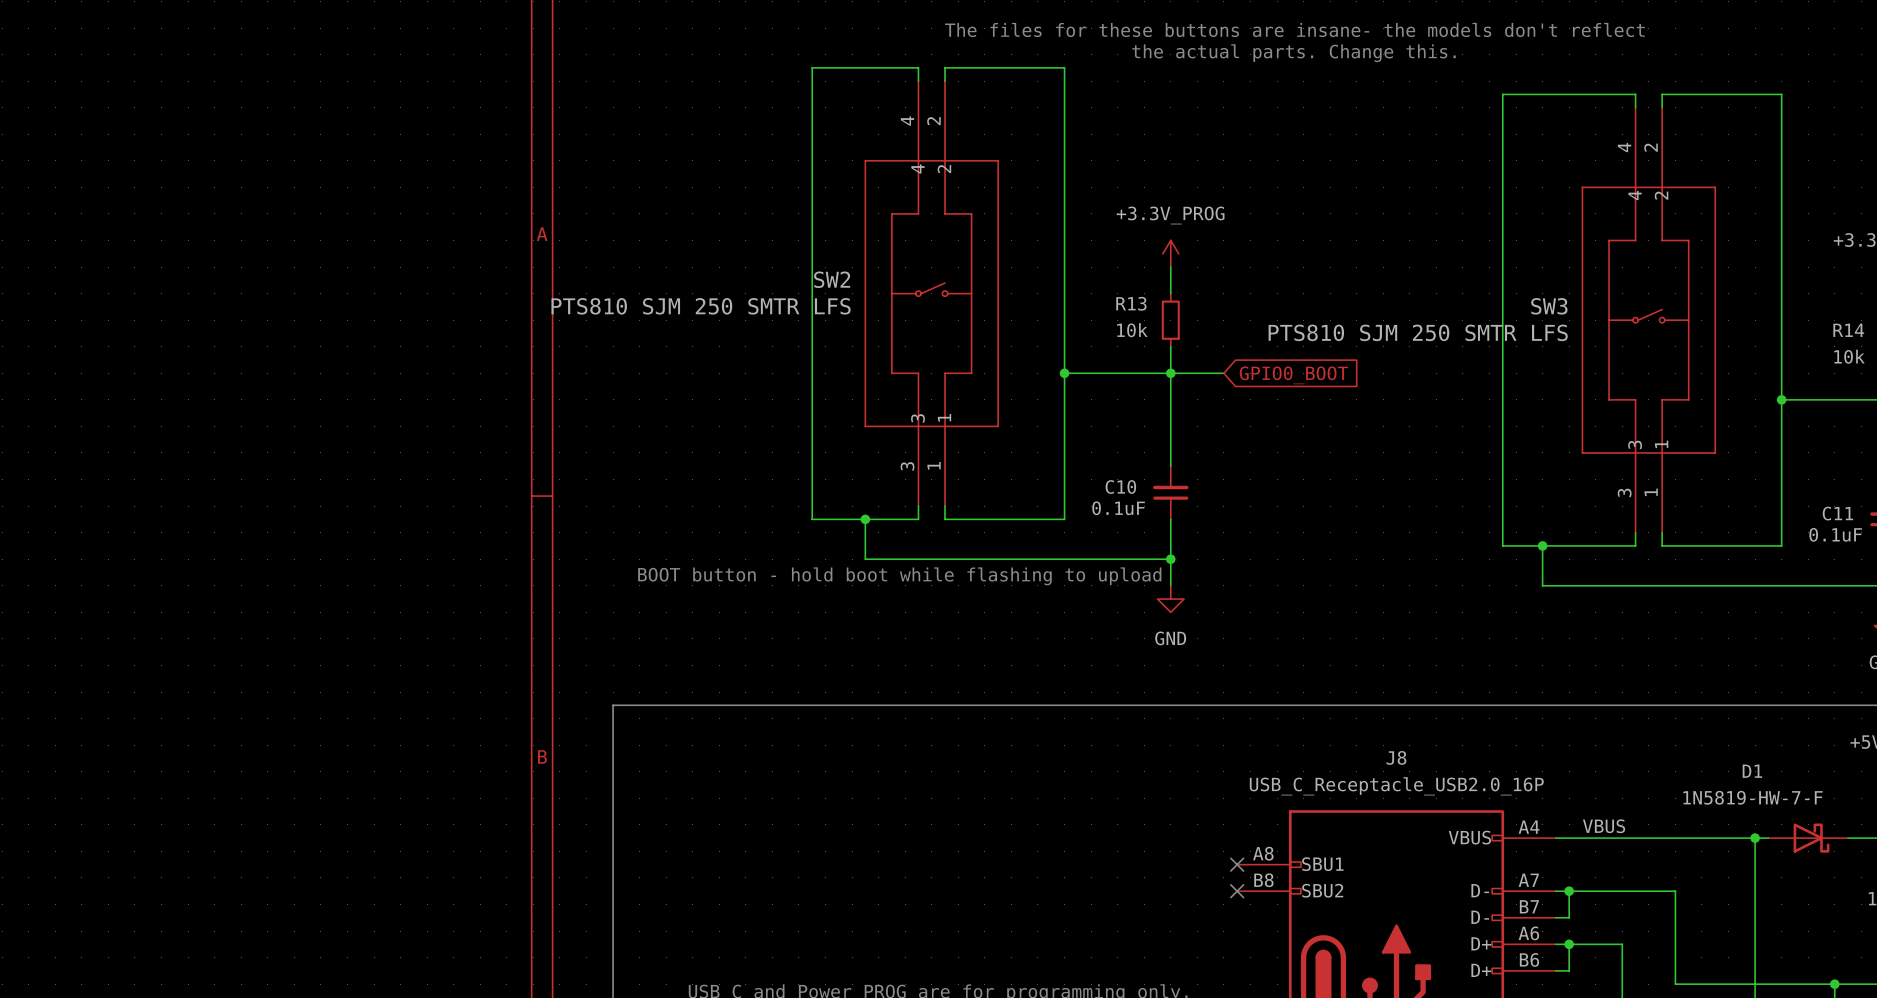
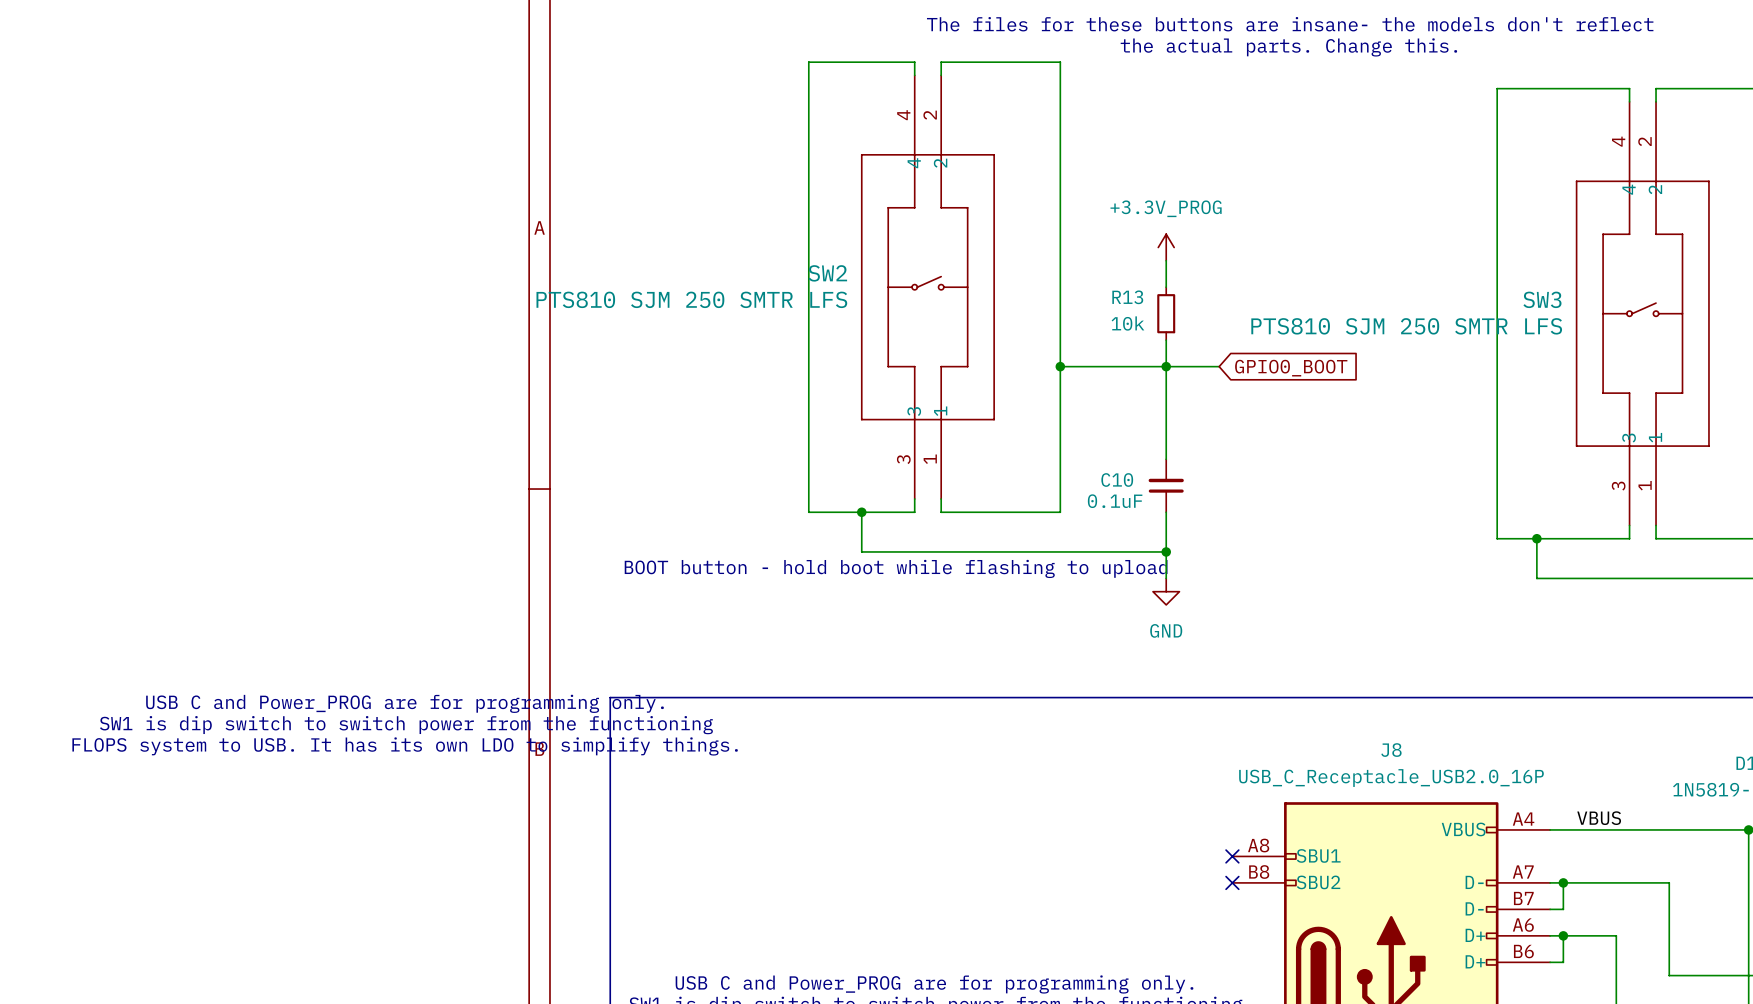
text: none -> USB C and Power_PROG are for programming only. (404, 703)
text: none -> SW1 is dip switch to switch power from the functioning (406, 725)
text: none -> FLOPS system to USB. It has its own LDO to simplify things. (405, 746)

